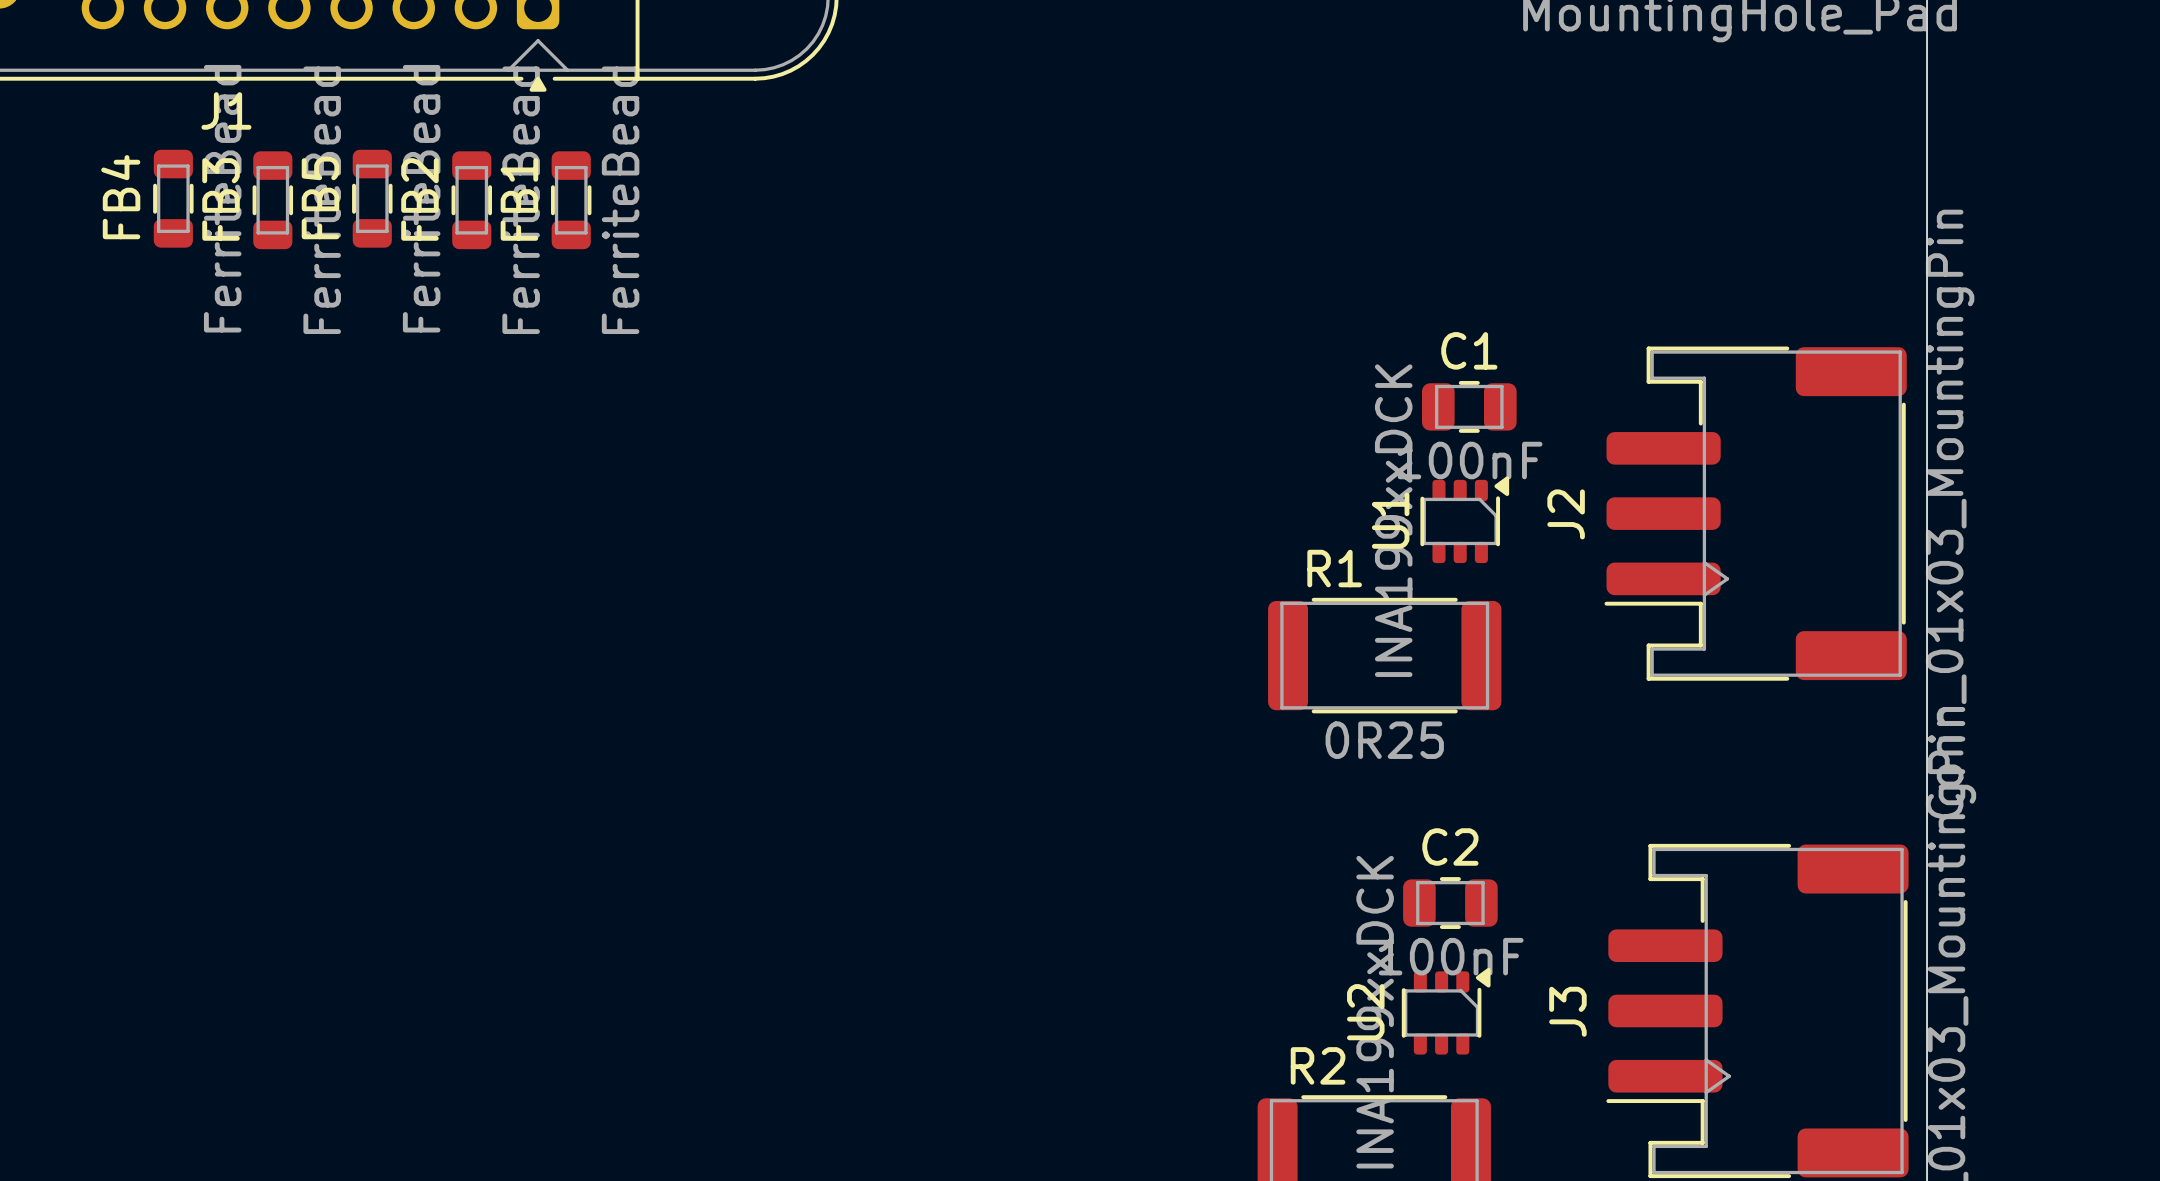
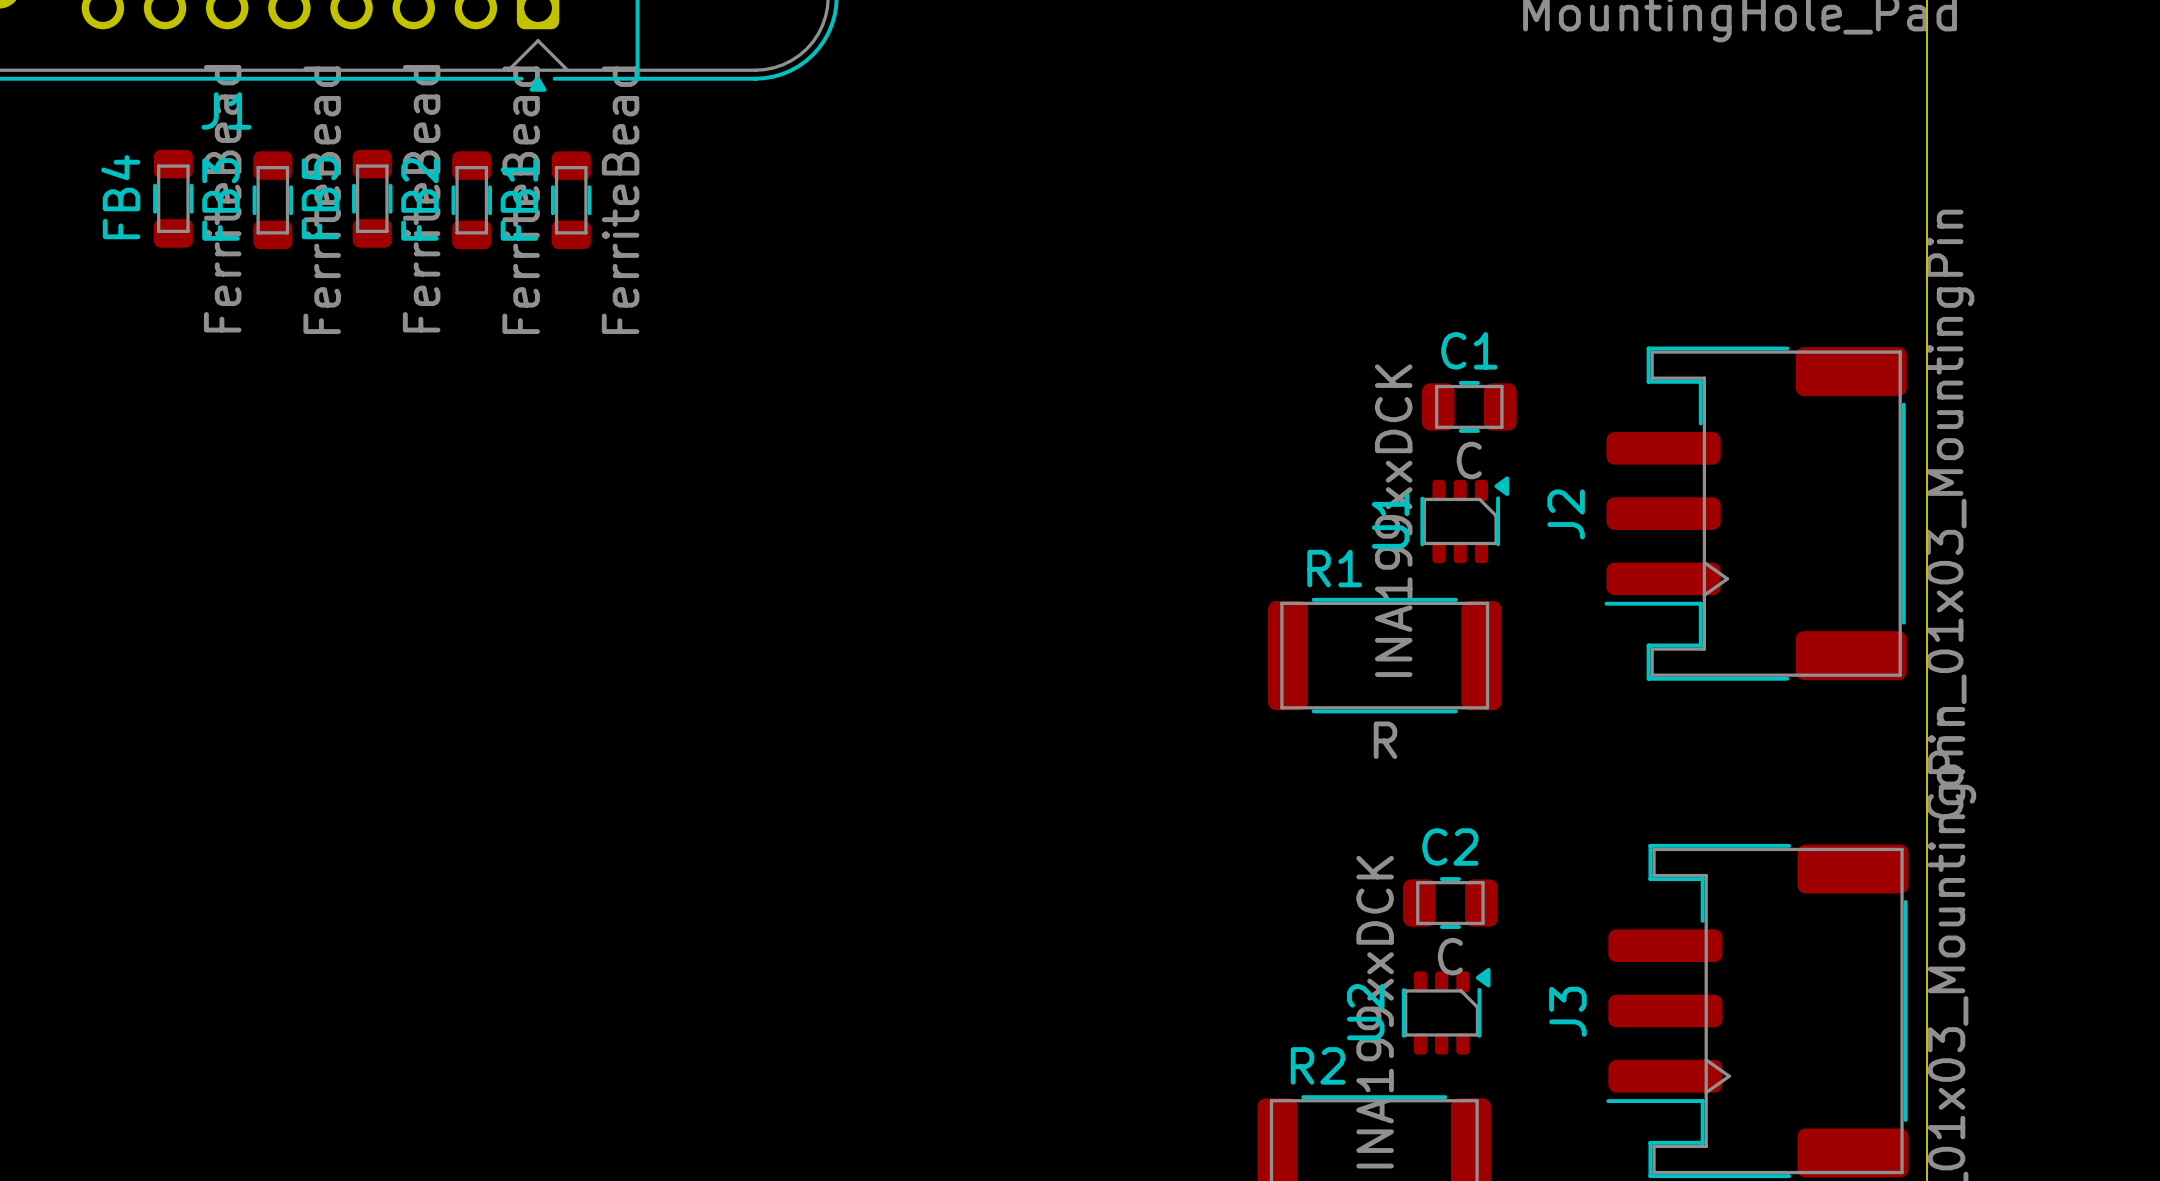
C1 value: 100nF (1470, 460) -> C (1469, 460)
R1 value: 0R25 (1384, 740) -> R (1385, 740)
C2 value: 100nF (1451, 956) -> C (1450, 956)

